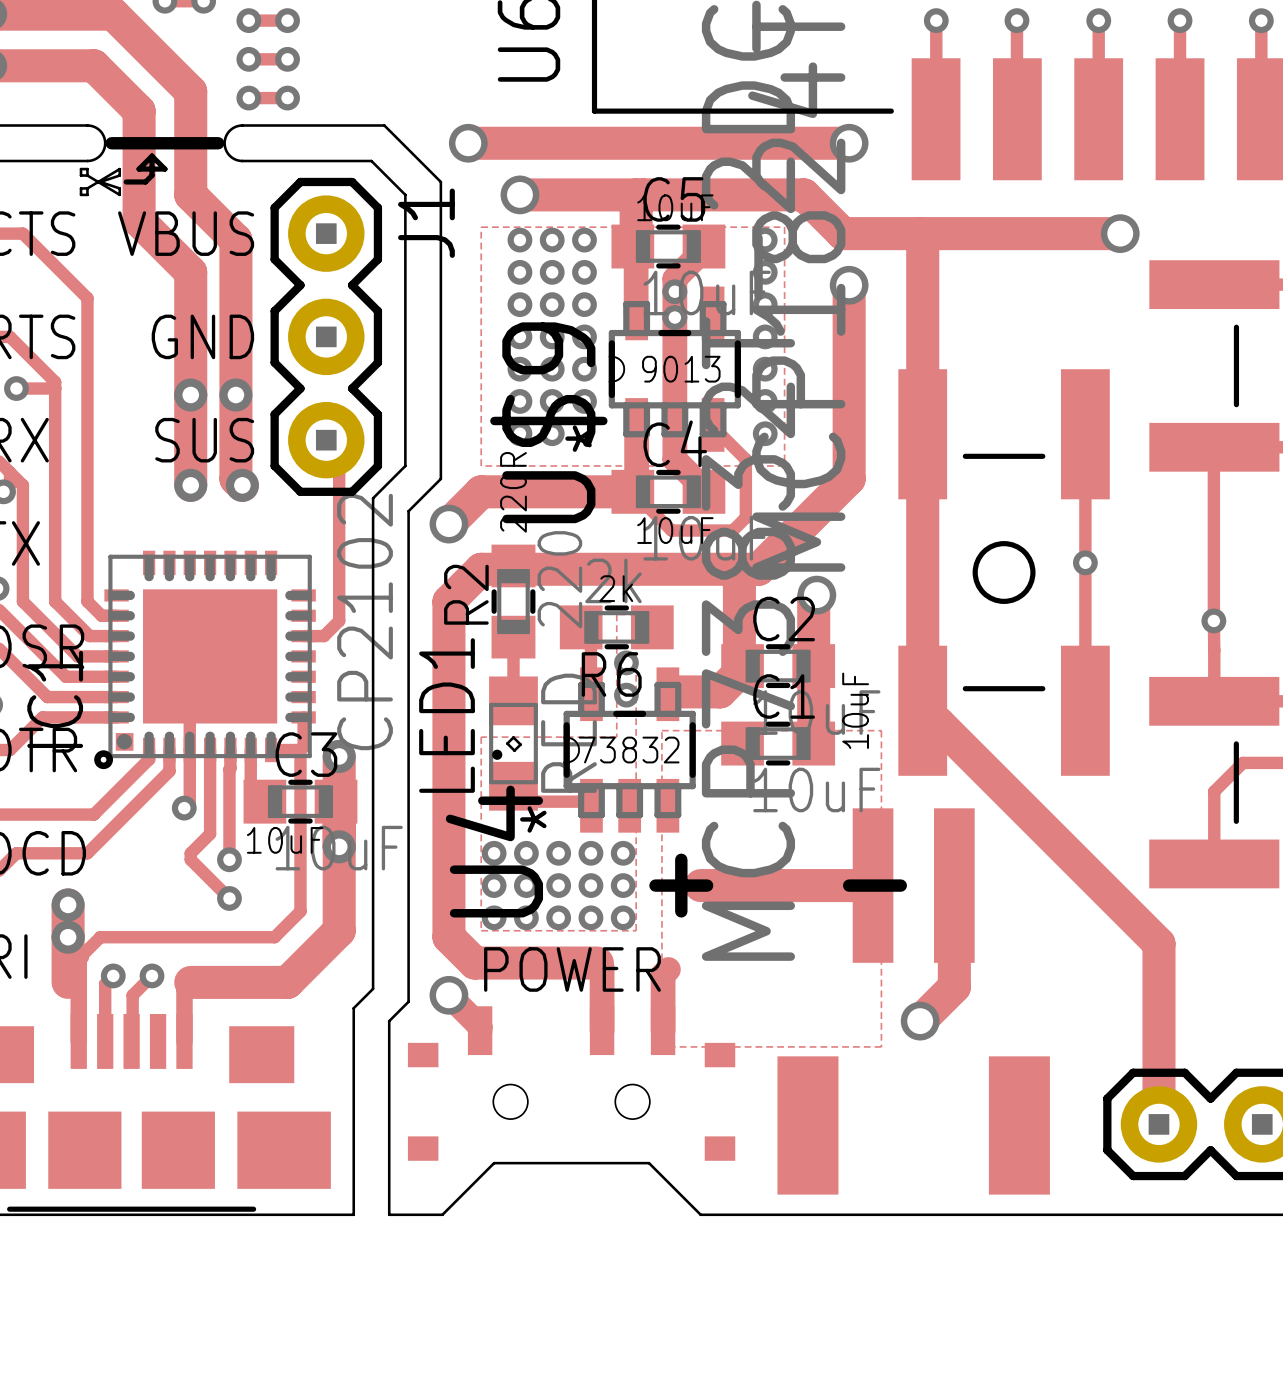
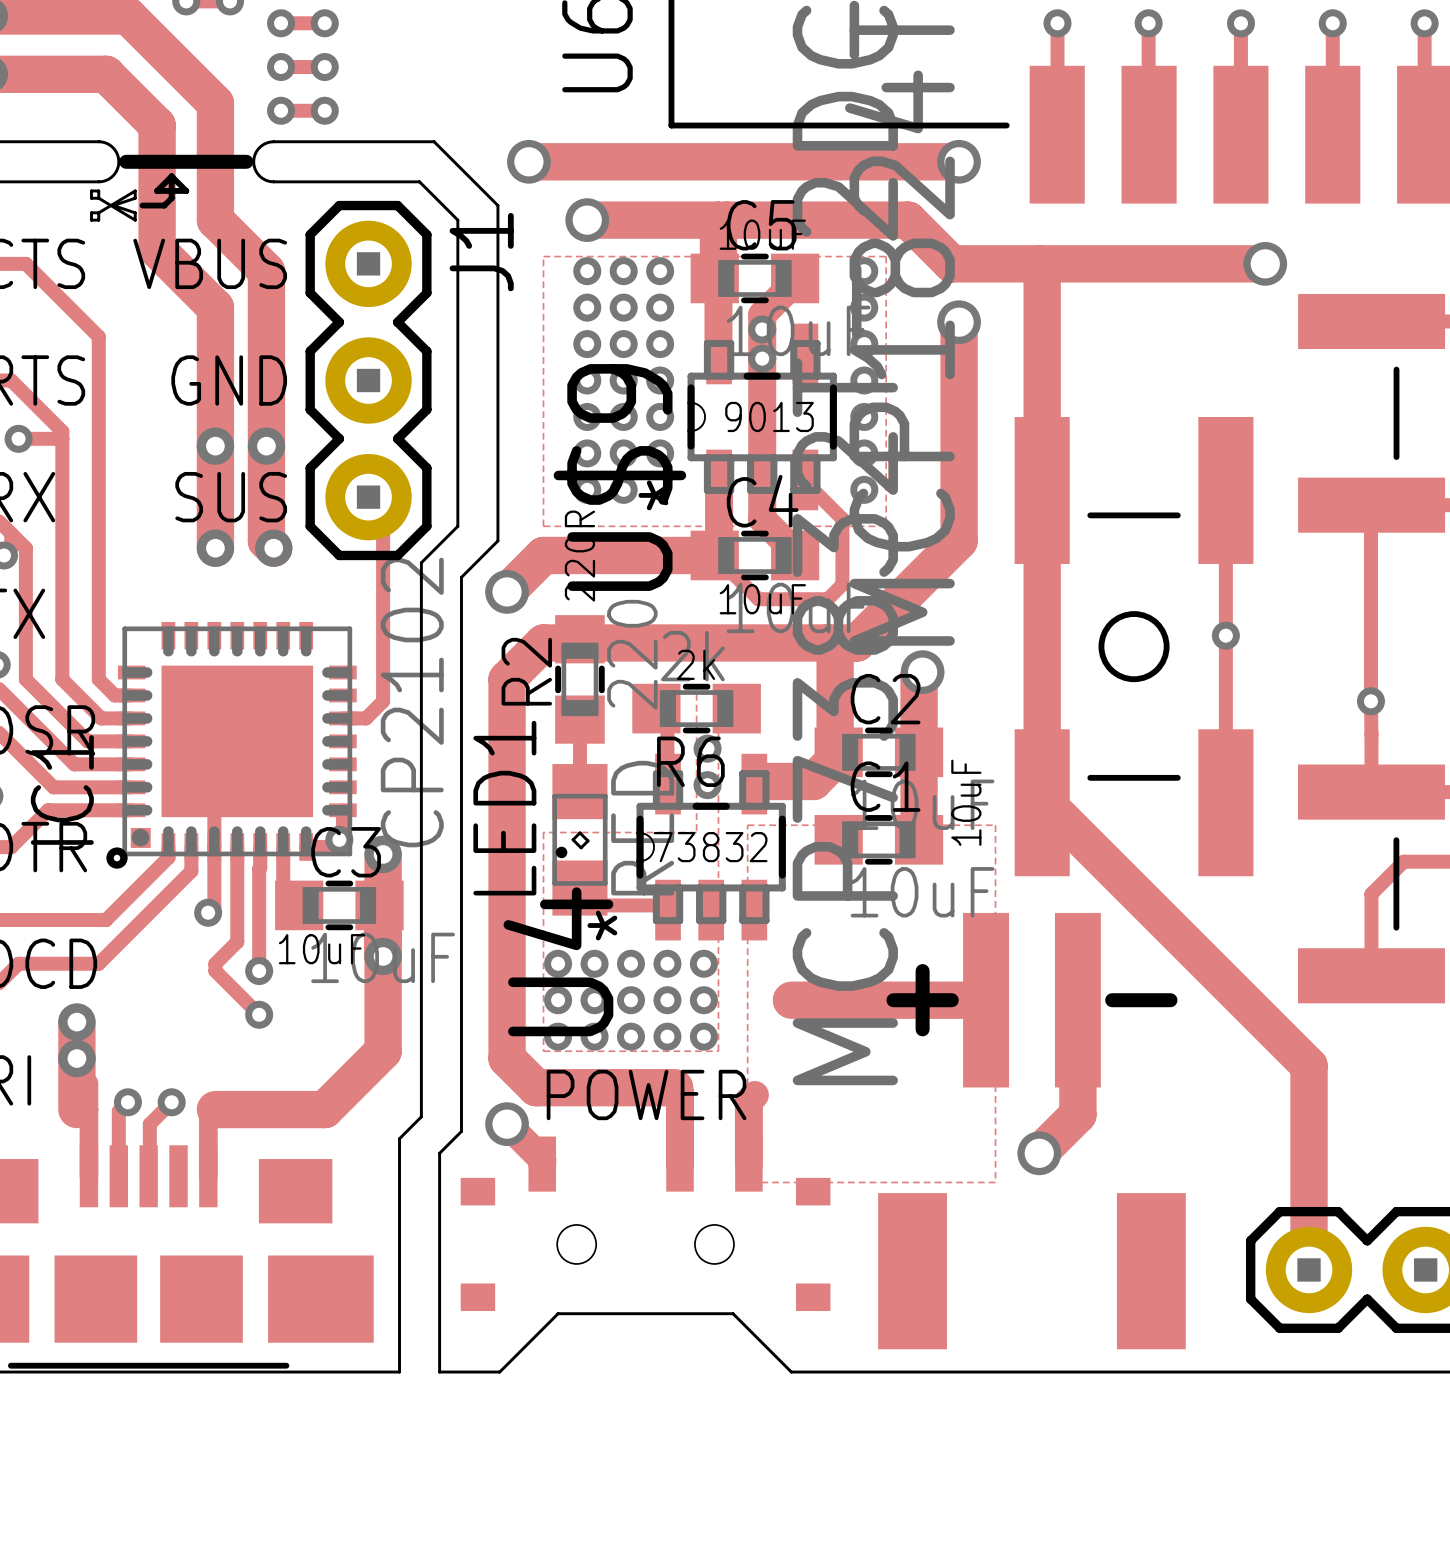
via: none -> (339, 839)
track: (300, 750) (300, 911) (274, 937) (100, 937) (78, 958) -> none
line: (681, 859) (681, 911) -> (922, 971) (922, 1029)
line: (655, 885) (707, 885) -> (1112, 1000) (1170, 1000)
line: (849, 885) (900, 885) -> (893, 1000) (951, 1000)

